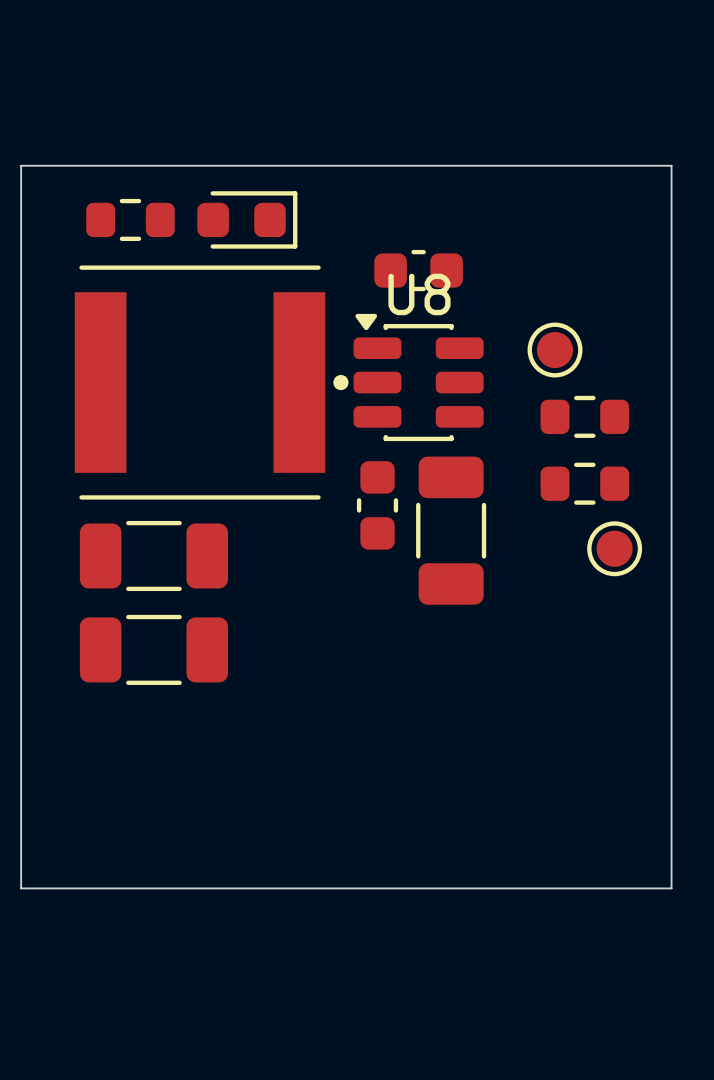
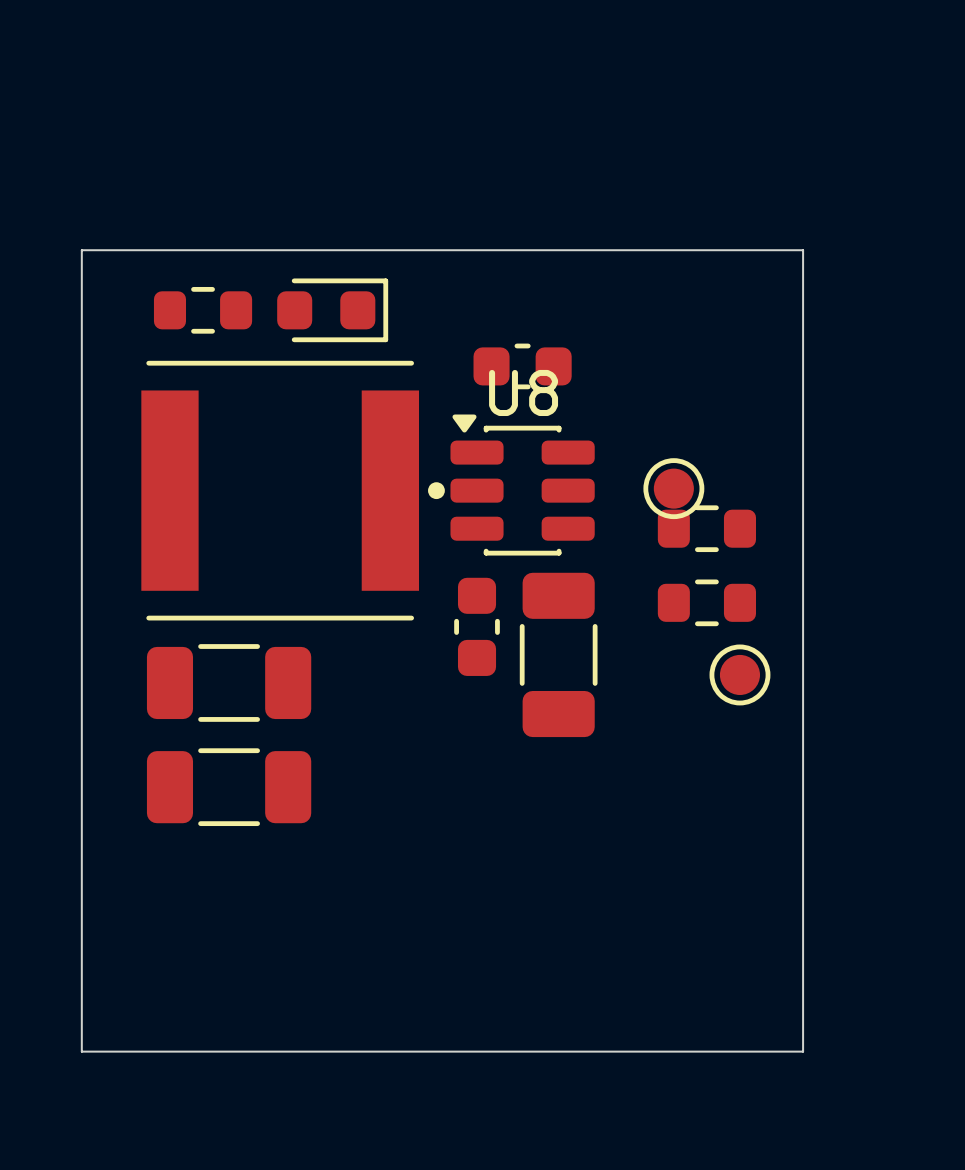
part position: (555, 350) -> (673, 488)

